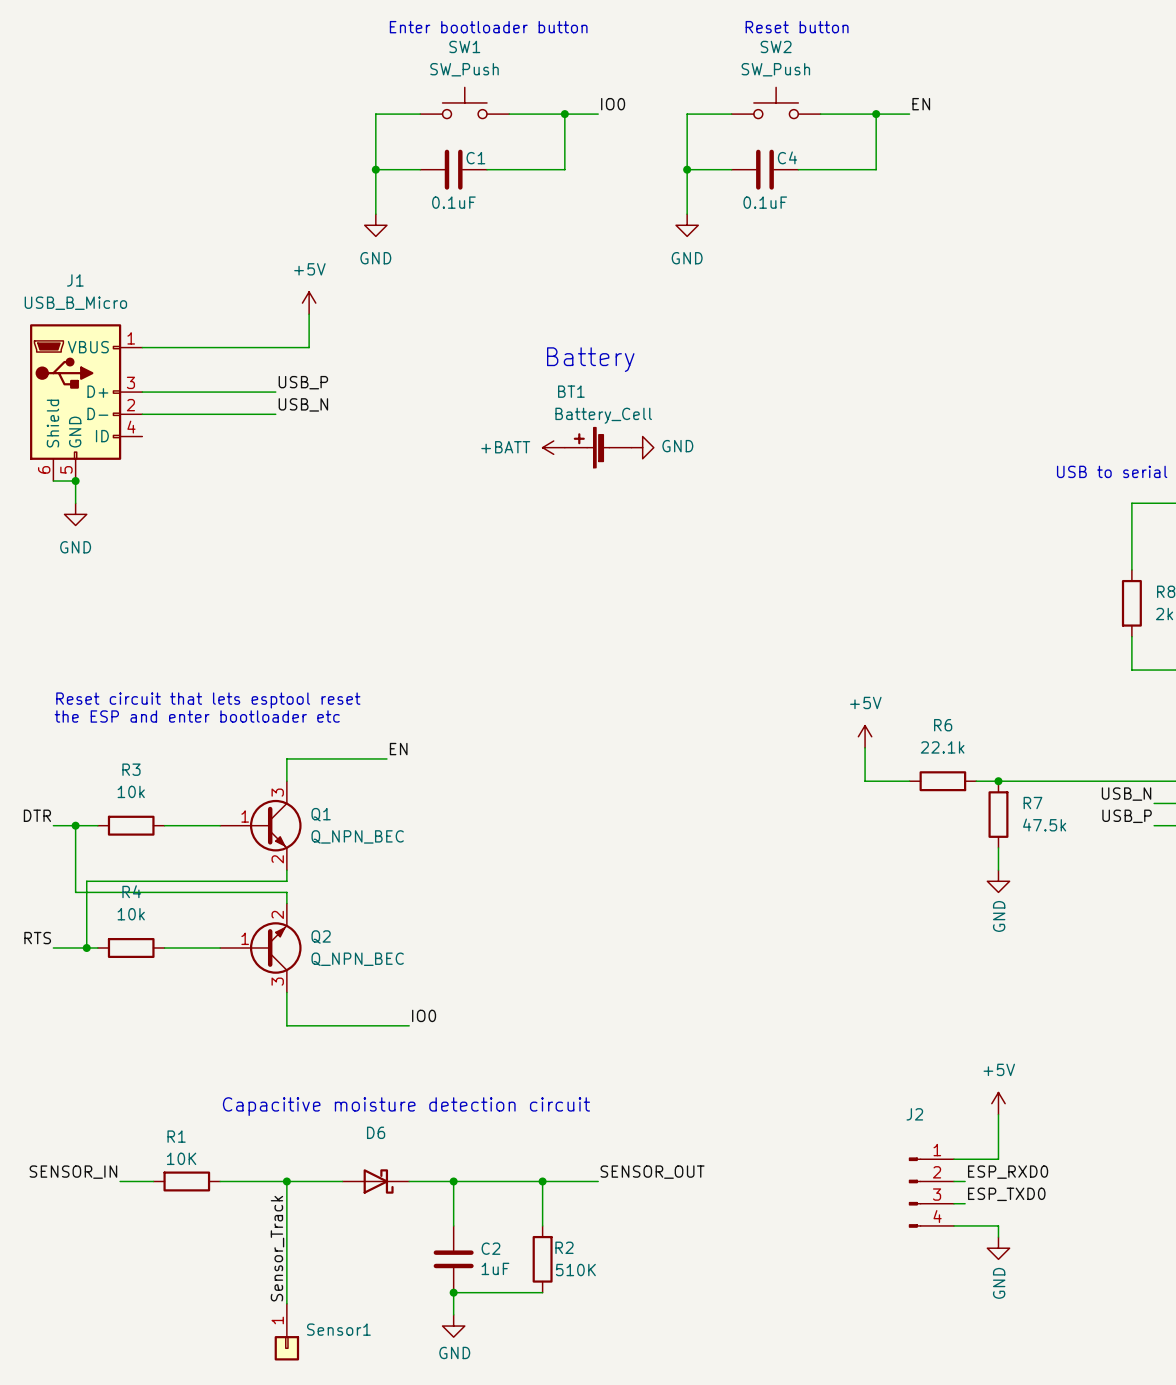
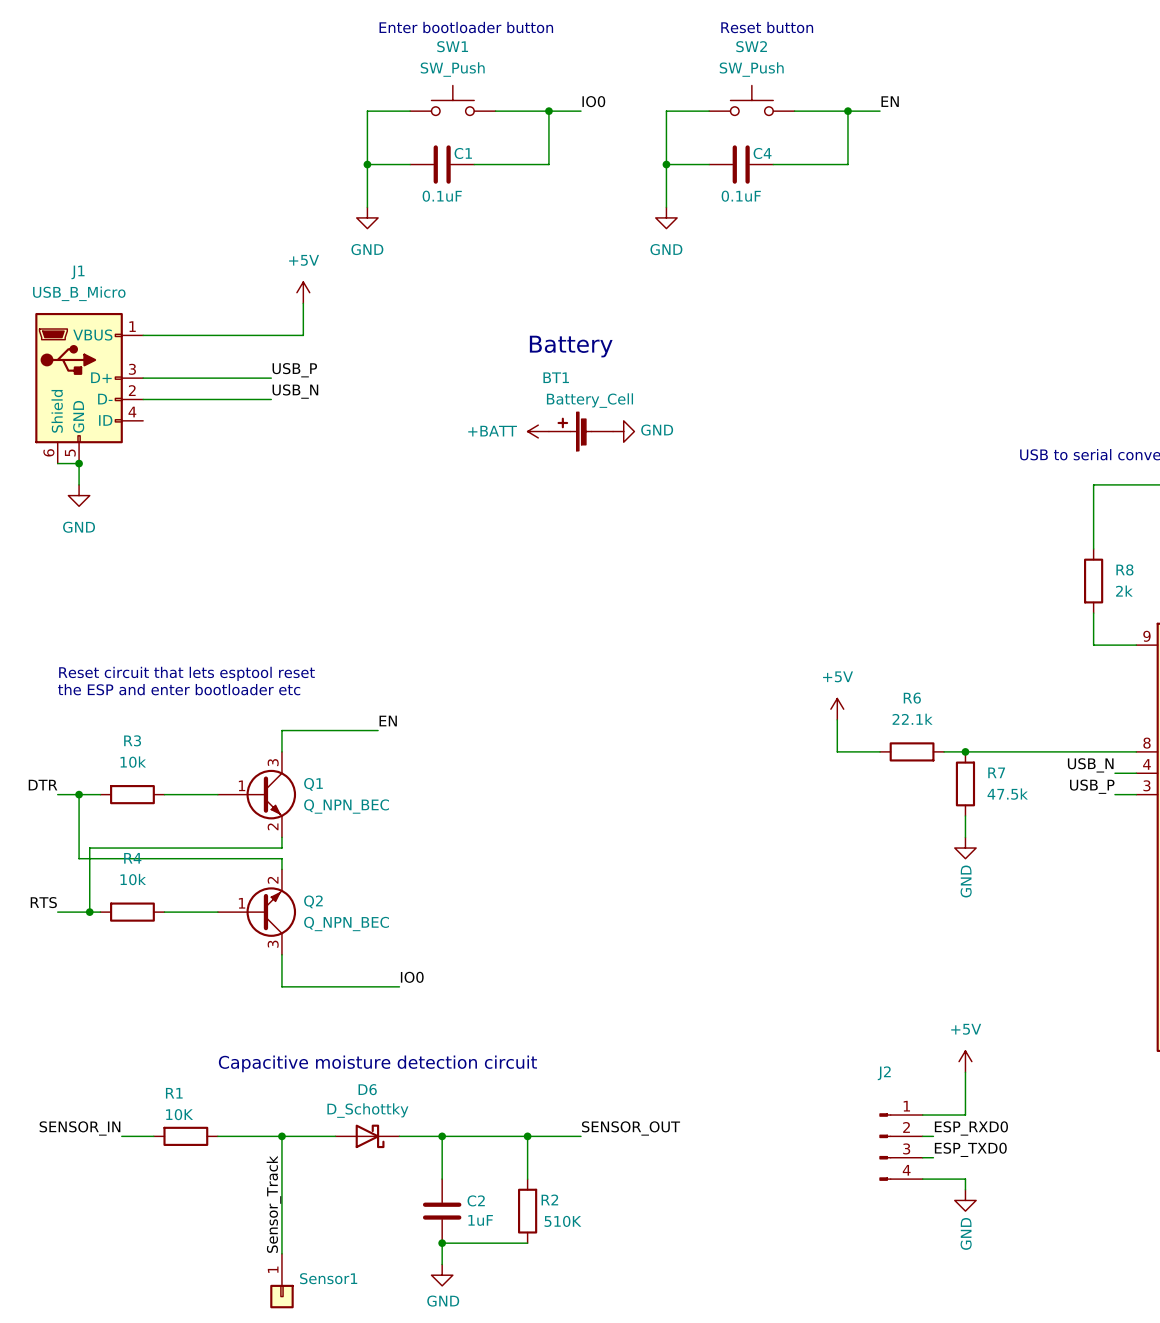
D6 value: none -> D_Schottky (367, 1110)

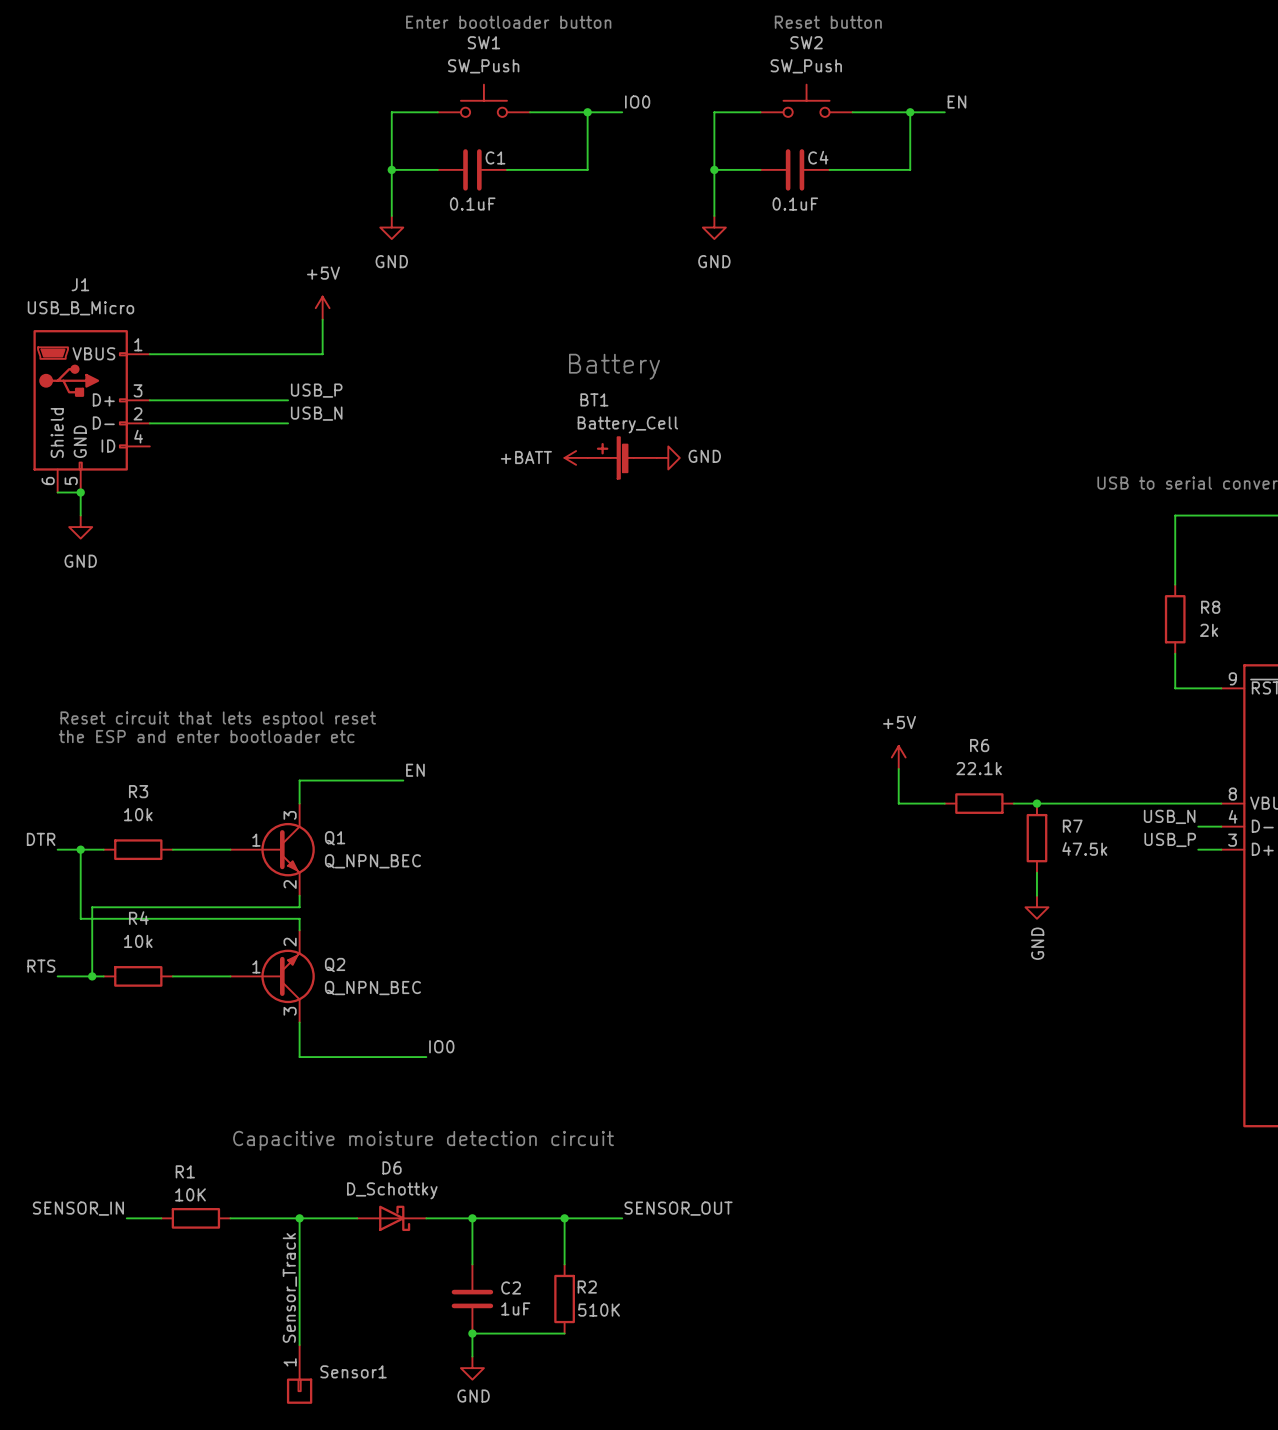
power symbol: +5V (965, 1061) -> none
wire: (965, 1072) (965, 1115) (922, 1115) -> none
label: ESP_RXD0 (971, 1128) -> none
wire: (922, 1136) (933, 1136) -> none
J2: (901, 1147) -> none
label: ESP_TXD0 (970, 1149) -> none
wire: (922, 1157) (933, 1157) -> none
wire: (922, 1179) (965, 1179) (965, 1189) -> none
power symbol: GND (965, 1200) -> none

